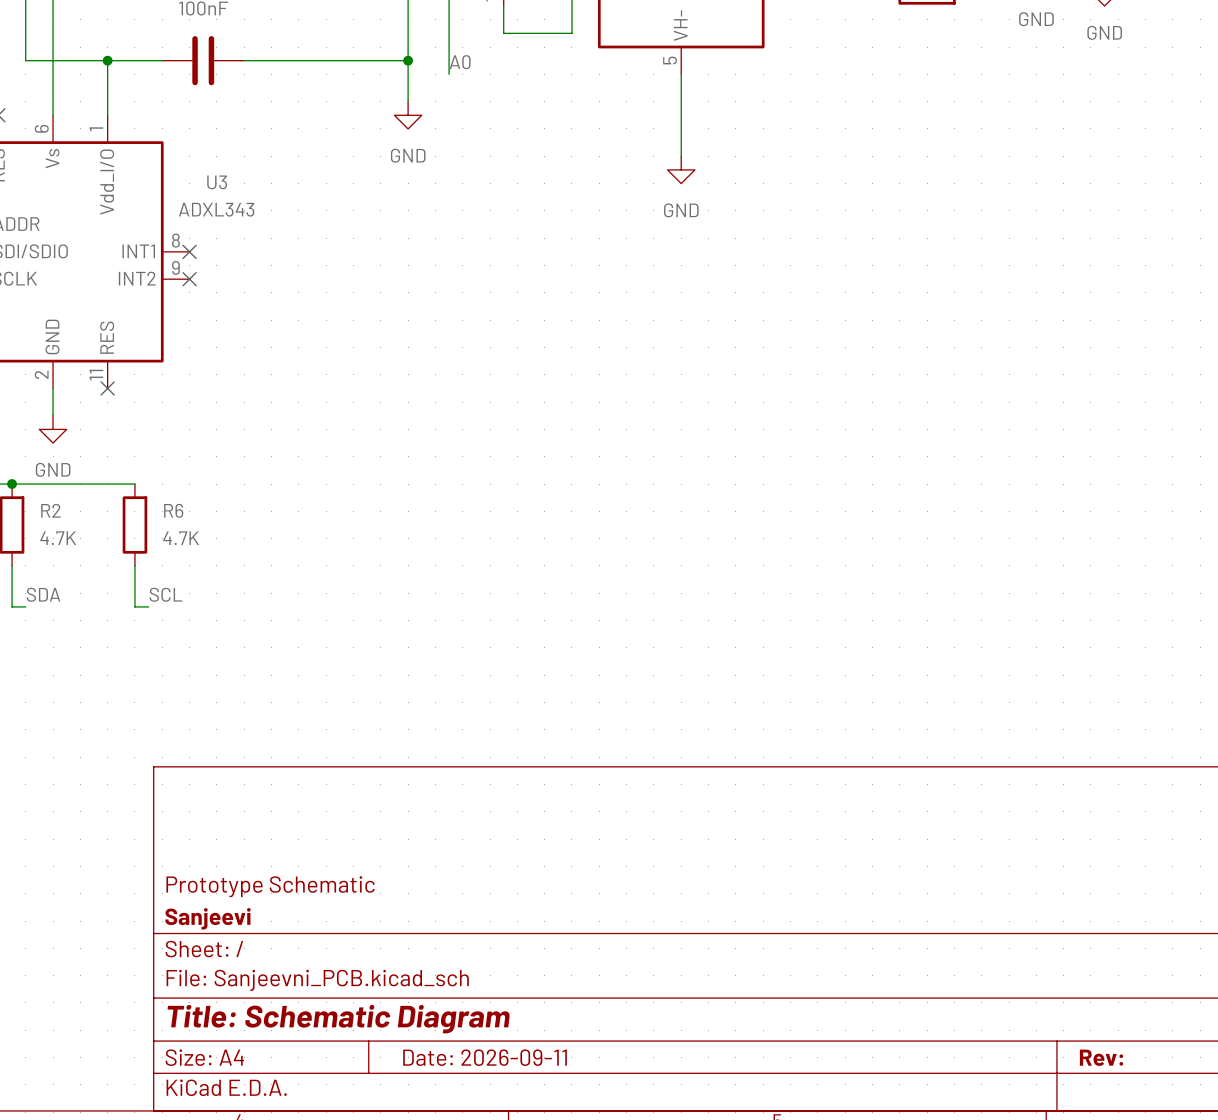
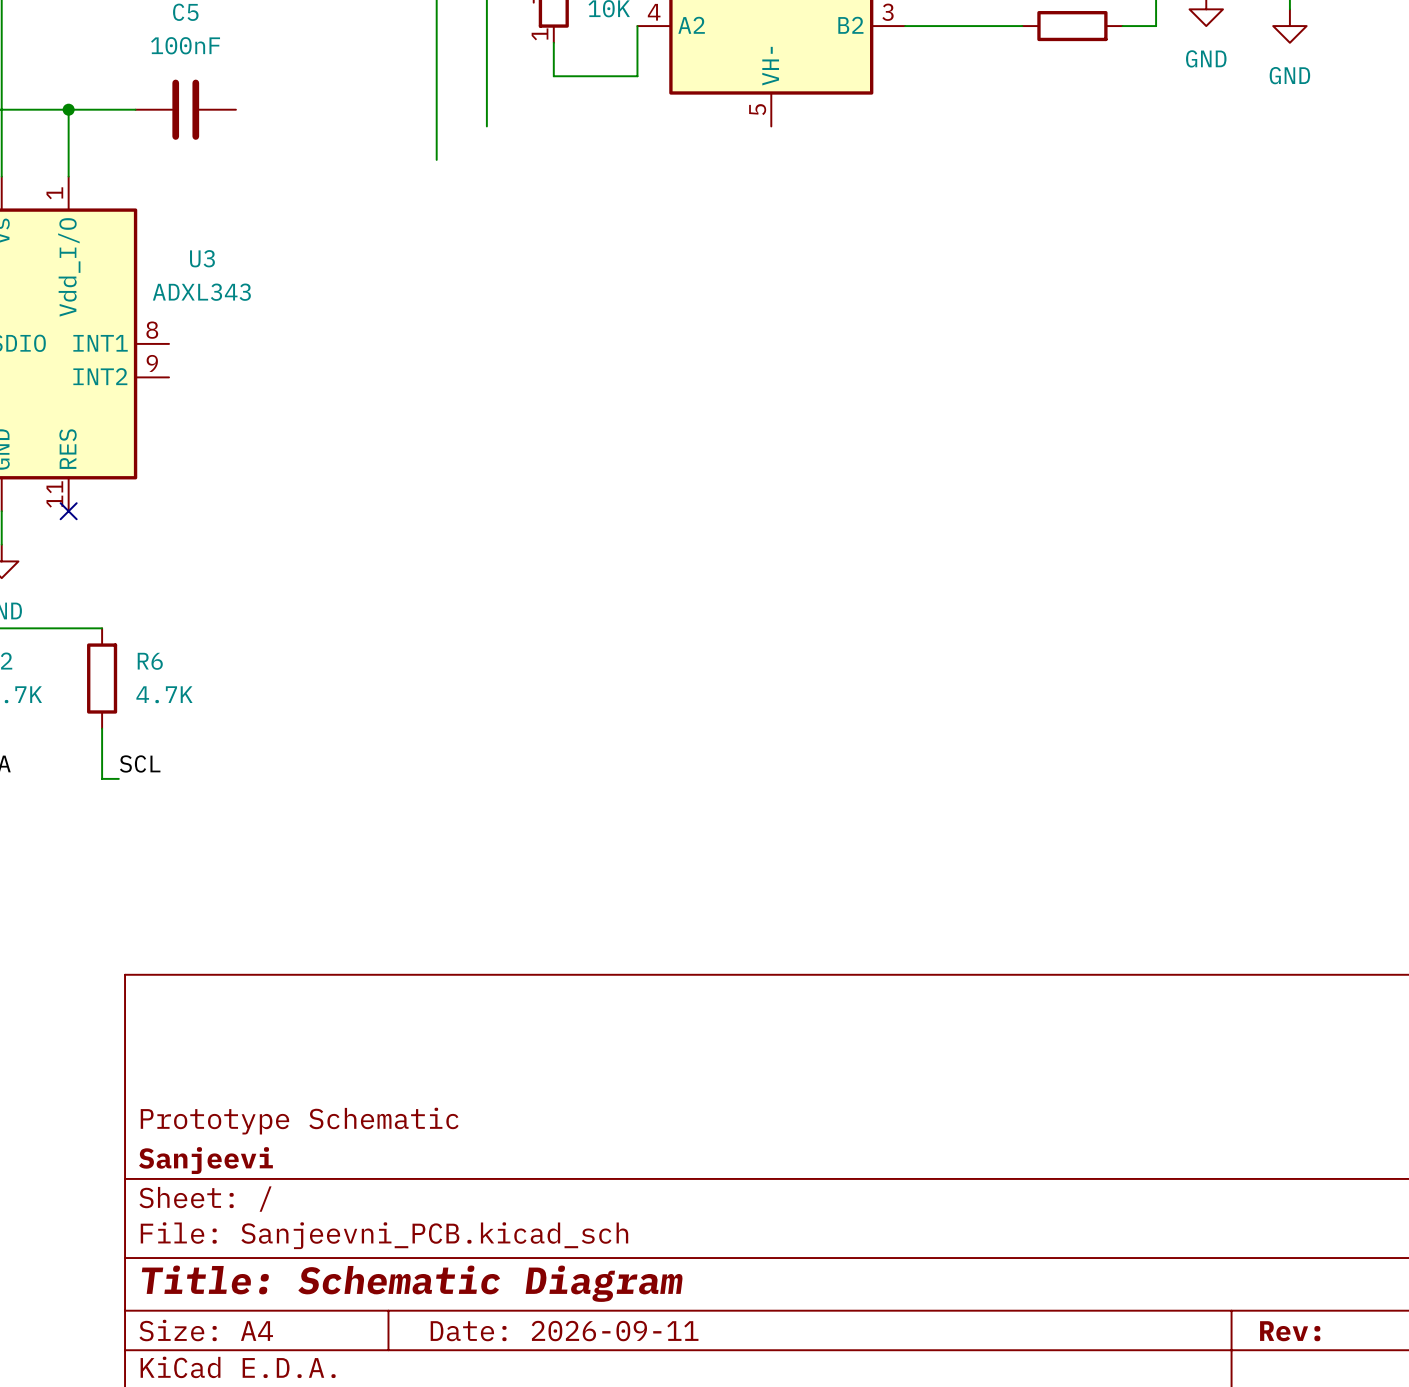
wire: (244, 60) (408, 60) -> none
junction: (408, 60) -> none
label: A0 (460, 62) -> none
wire: (681, 74) (681, 156) -> none
power symbol: GND (408, 115) -> none
power symbol: GND (681, 169) -> none
no-connect mark: (189, 251) -> none
no-connect mark: (189, 279) -> none

